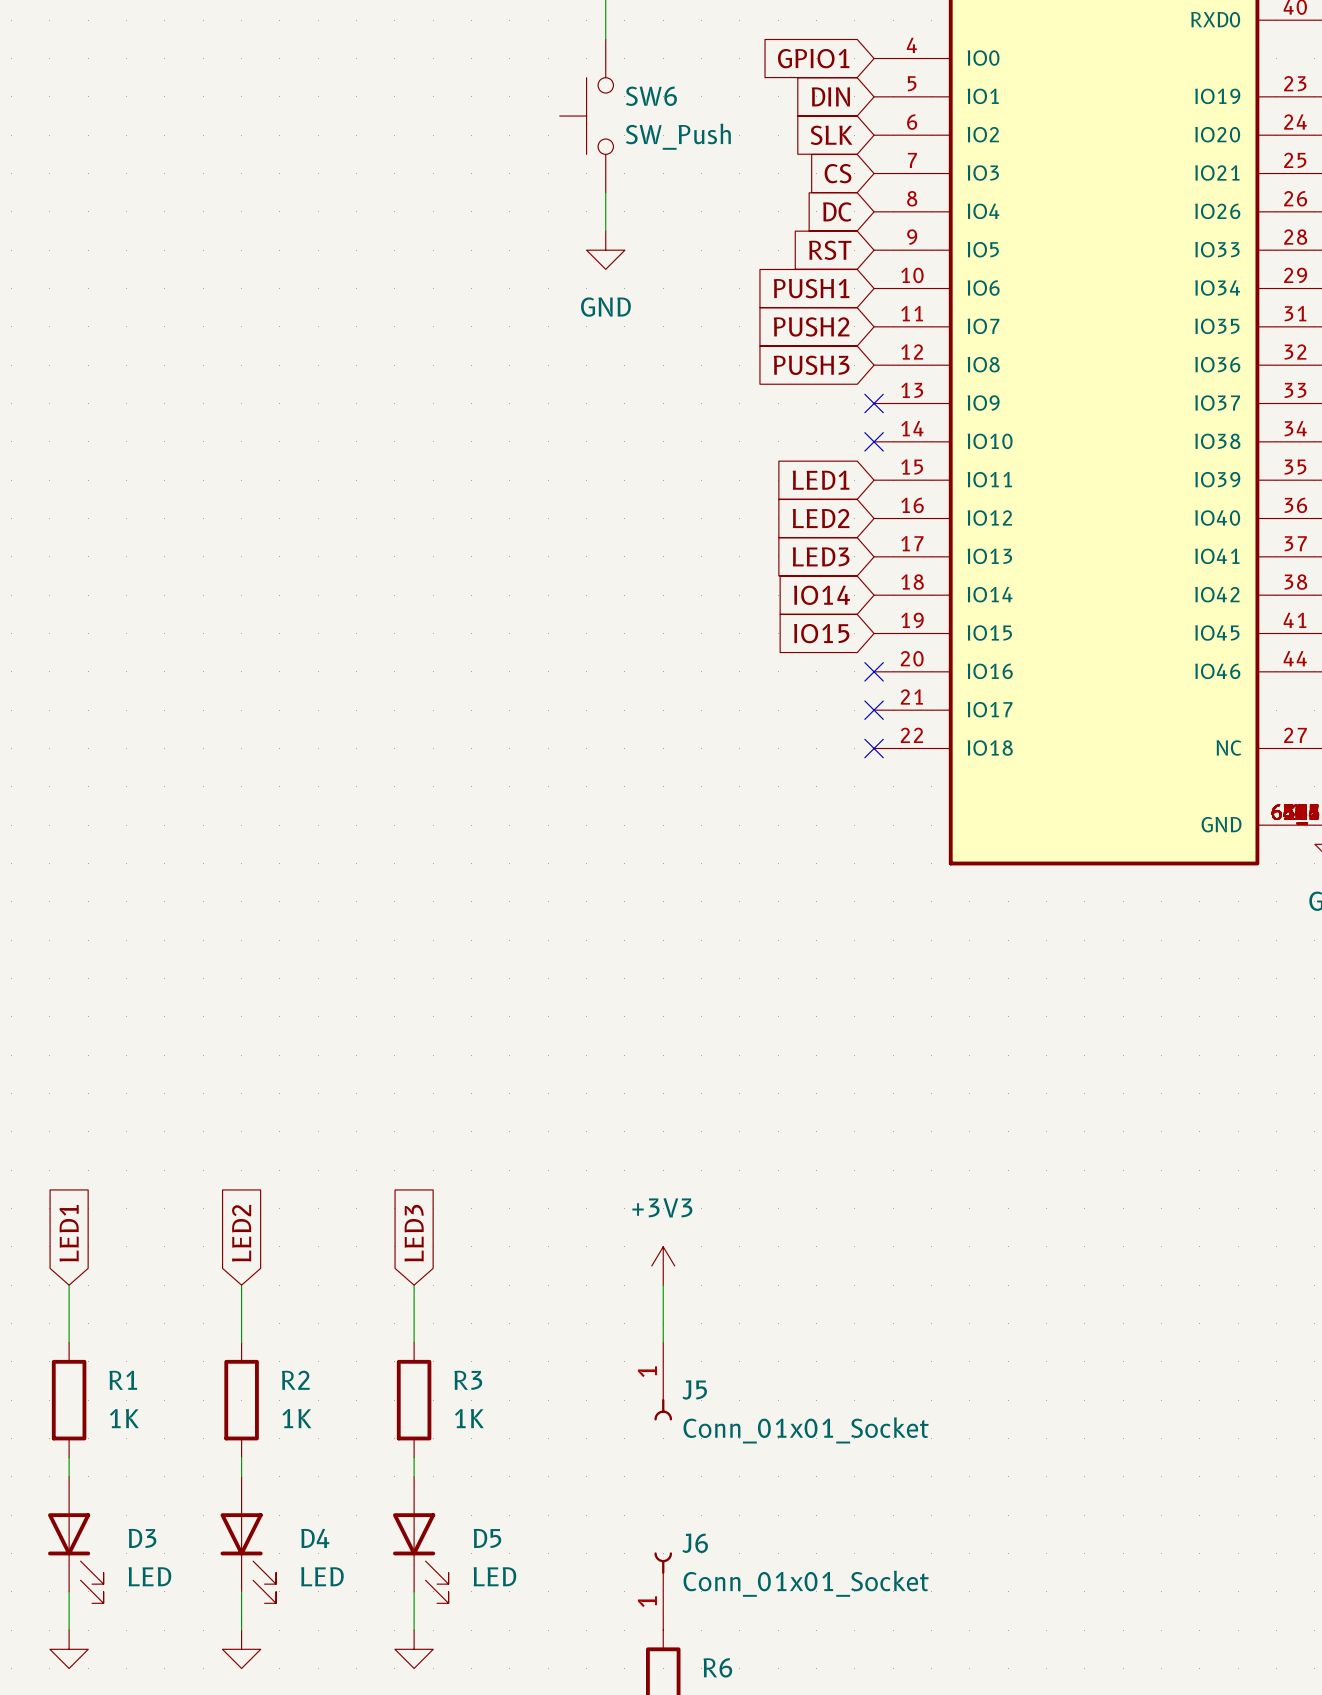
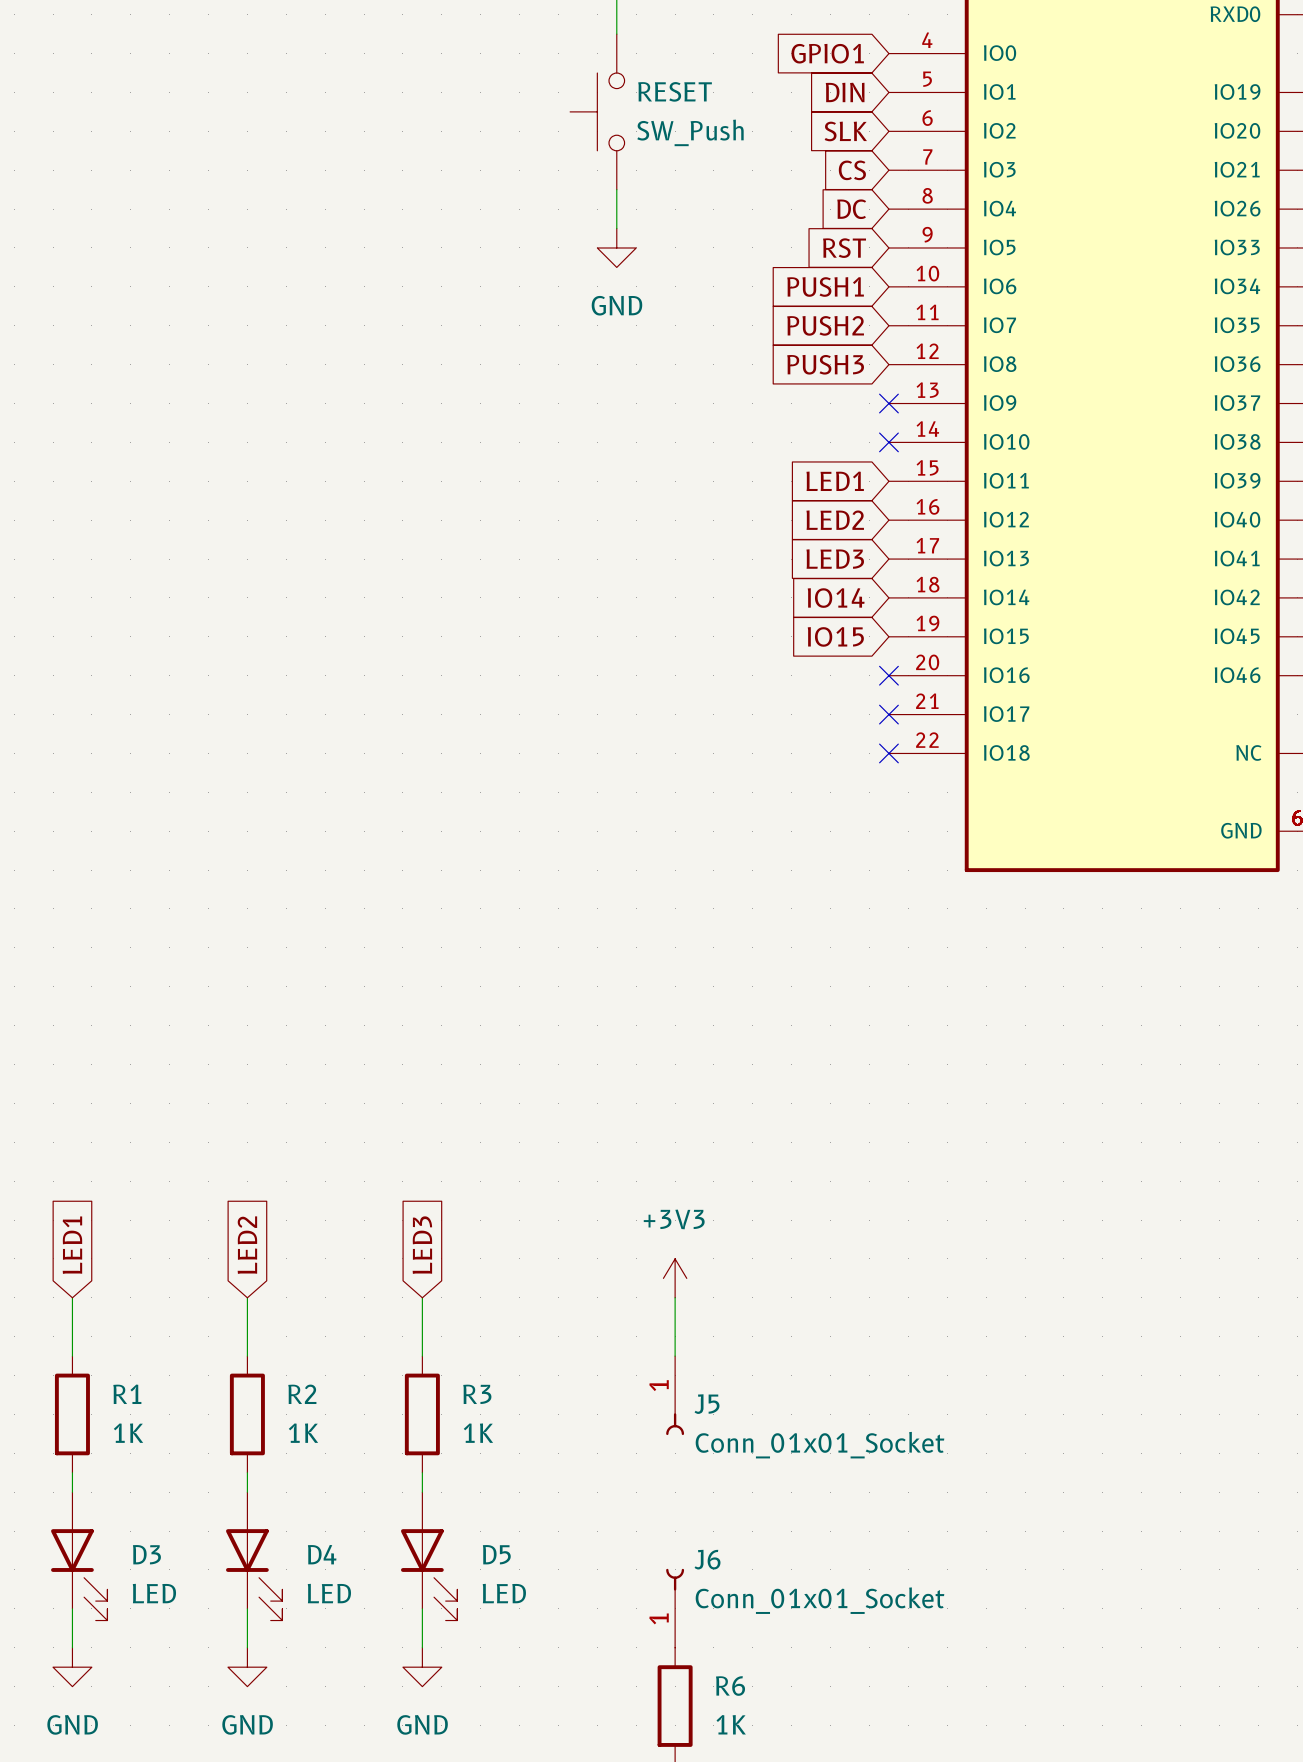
SW6 name: SW6 (651, 96) -> RESET (675, 91)

